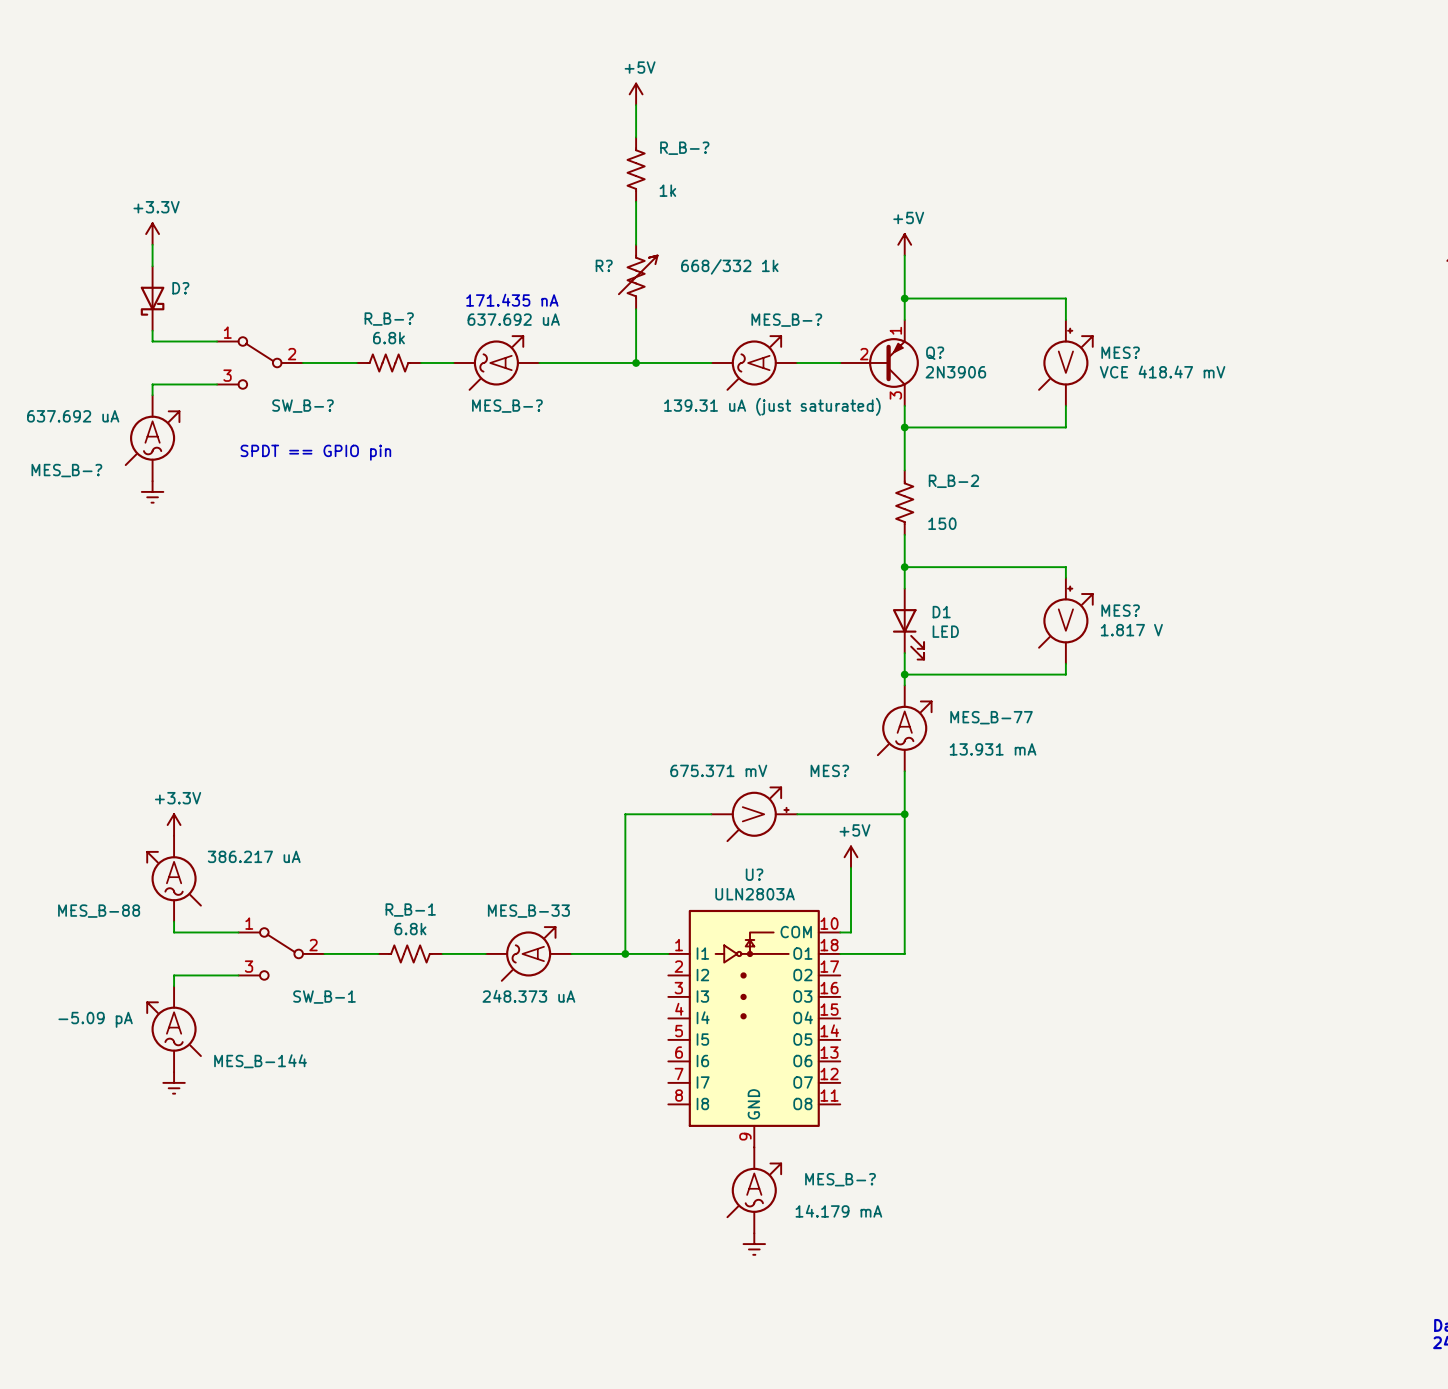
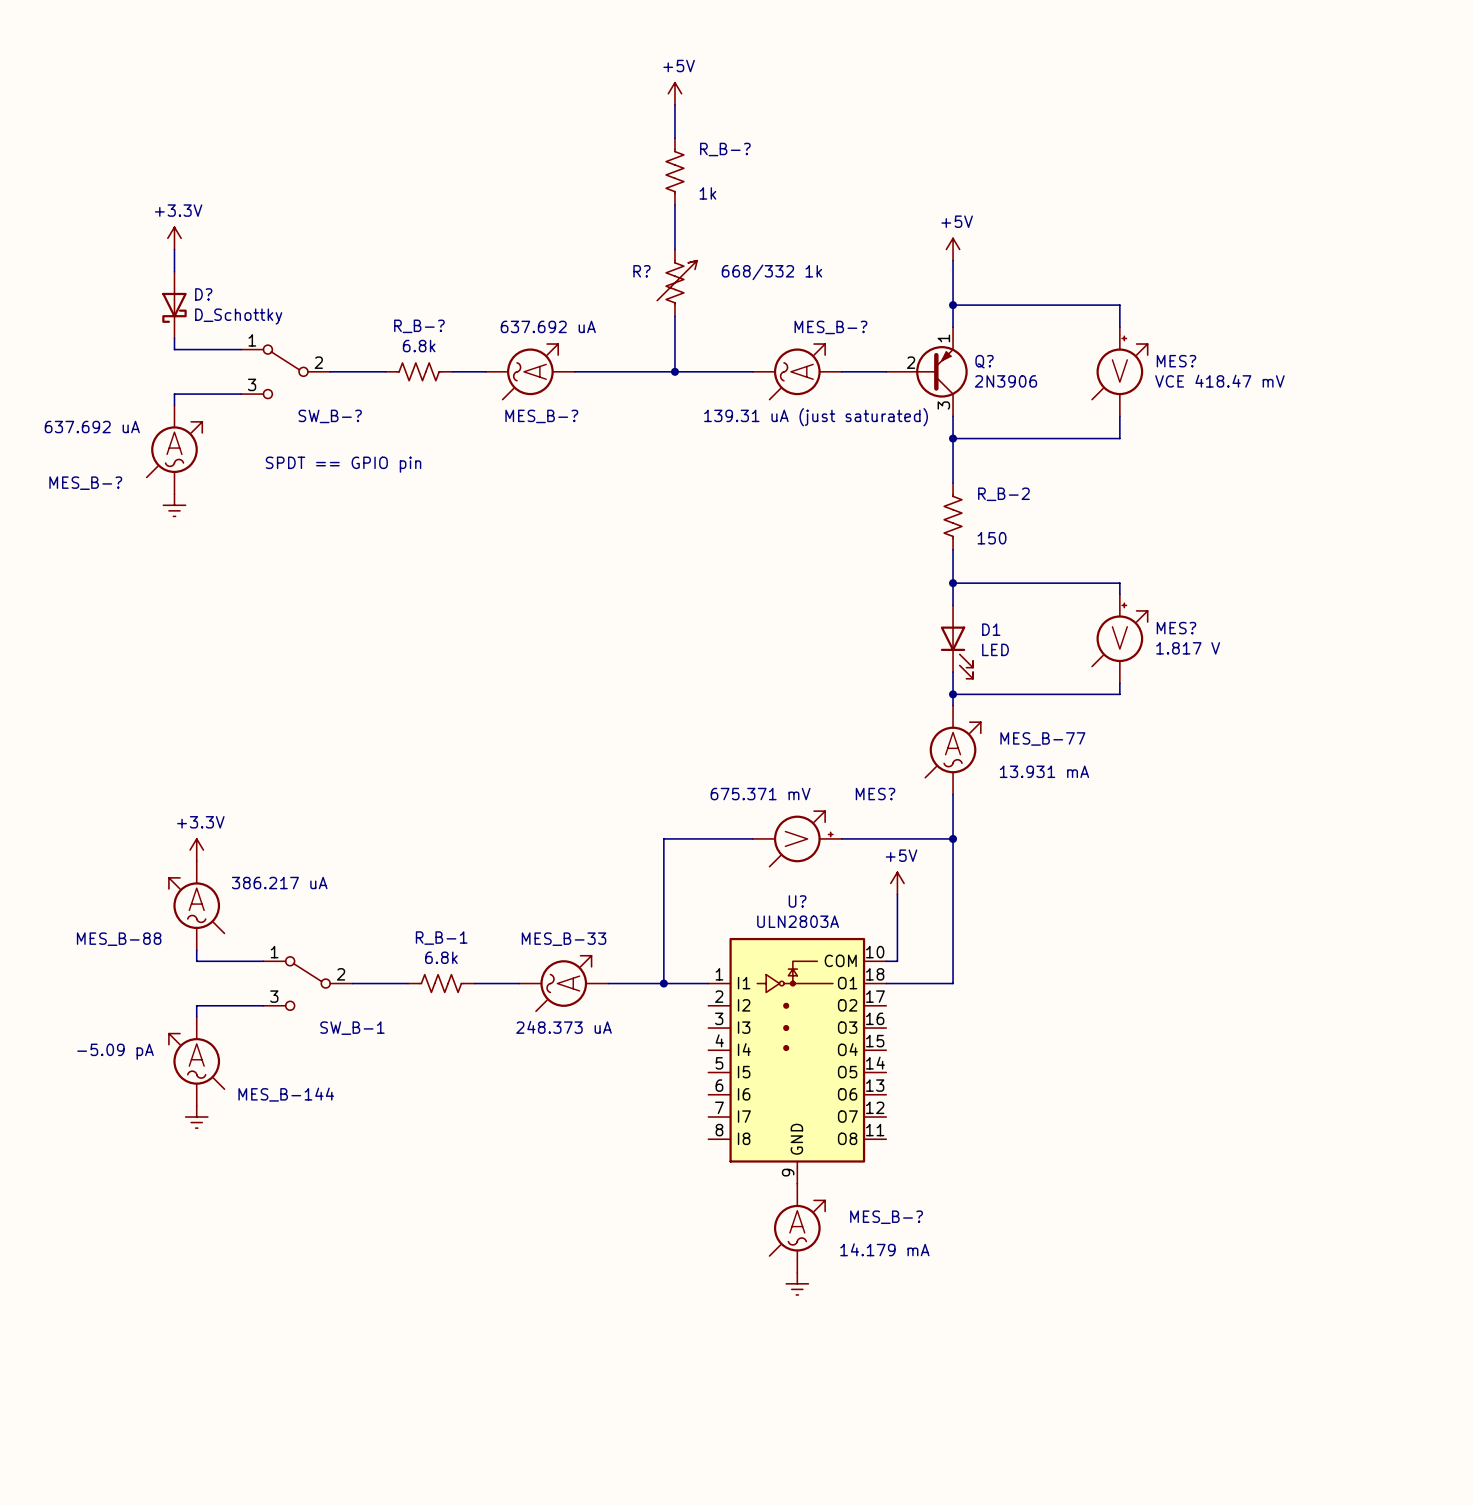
text: 171.435 nA (512, 300) -> none
D? value: none -> D_Schottky (238, 316)

